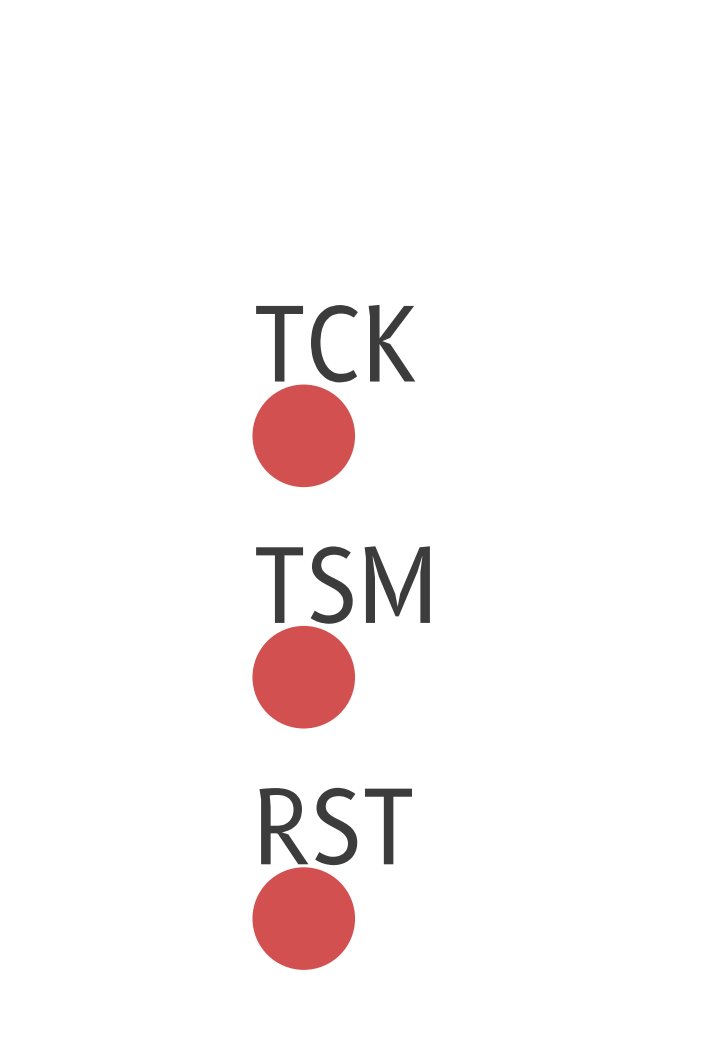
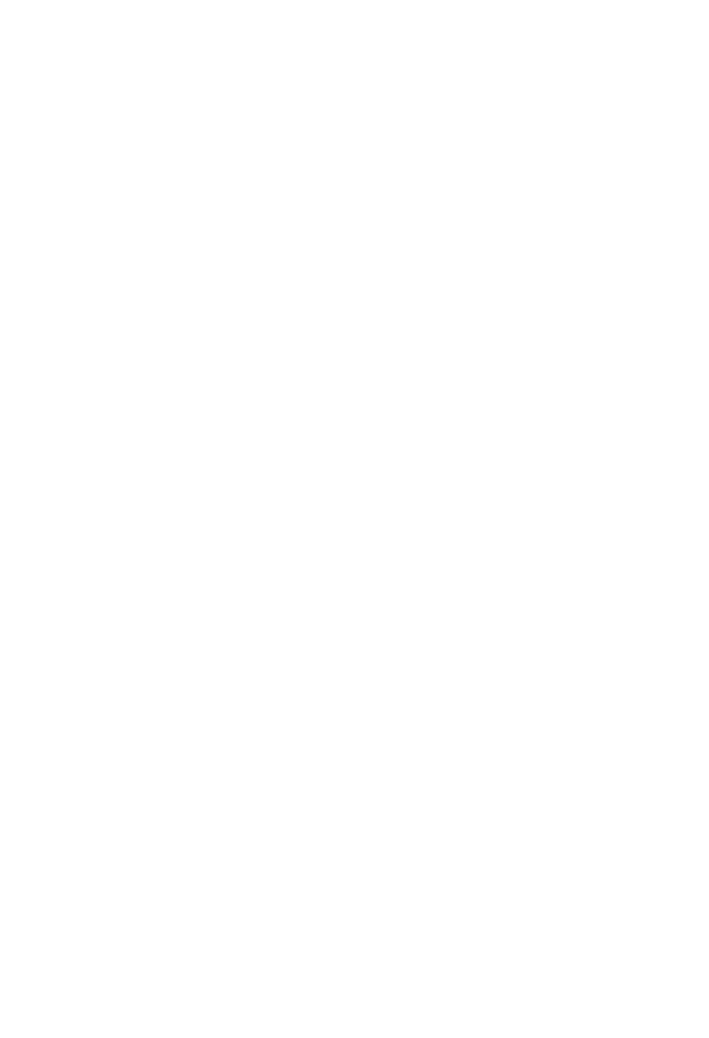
TCK: (303, 435) -> none
TSM: (303, 677) -> none
RST: (303, 918) -> none

